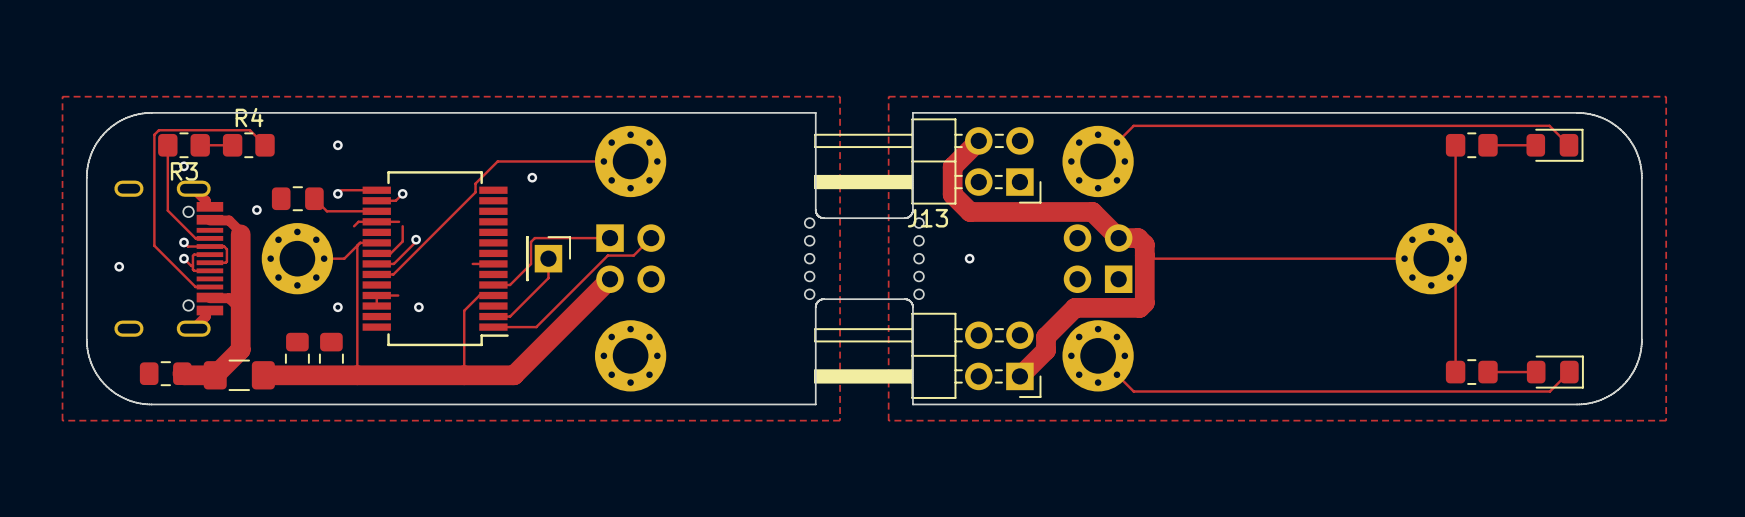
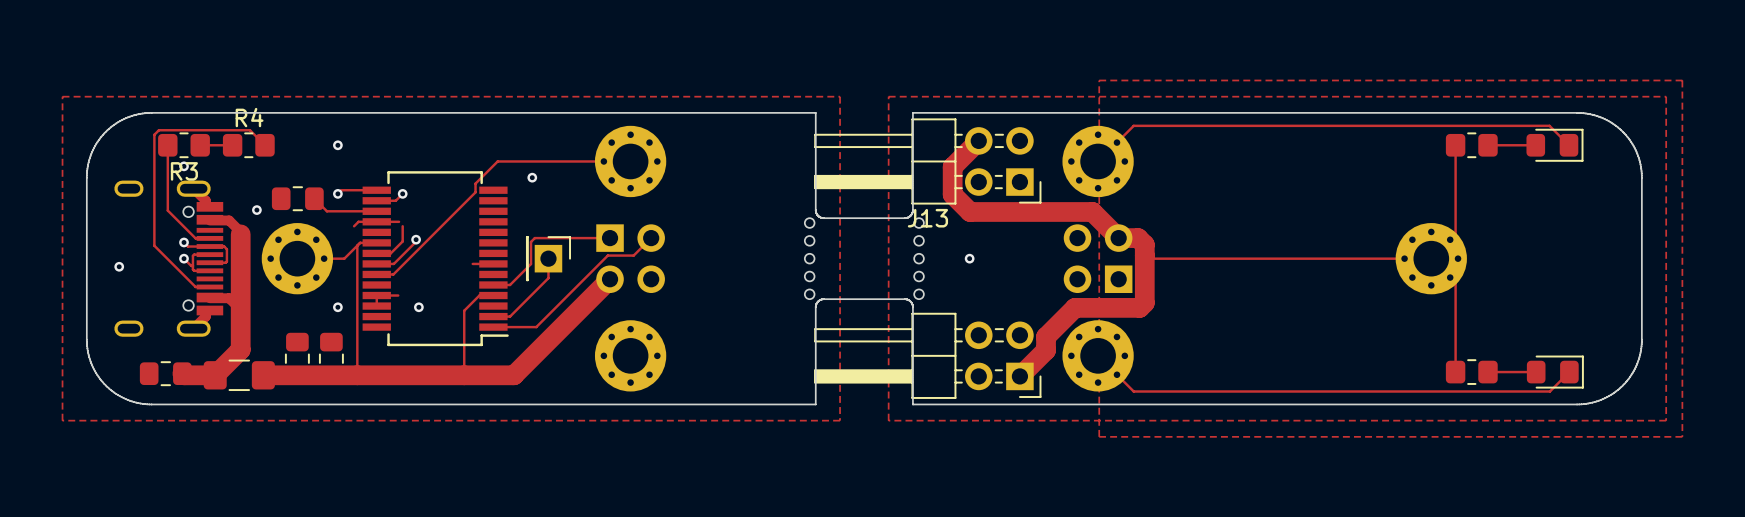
zone outline: none -> (1099, 80) (1099, 436) (1682, 436) (1682, 80) (1099, 80)

